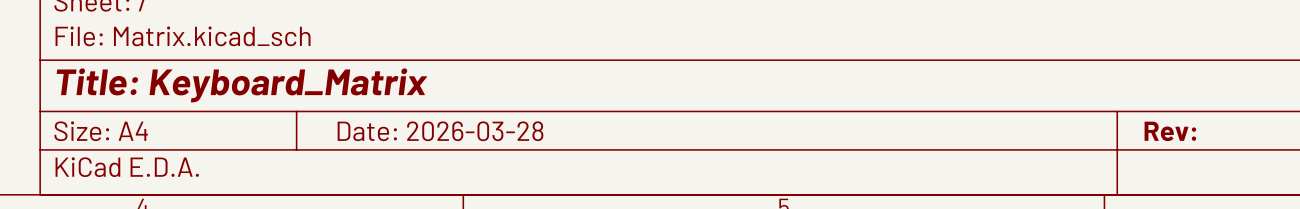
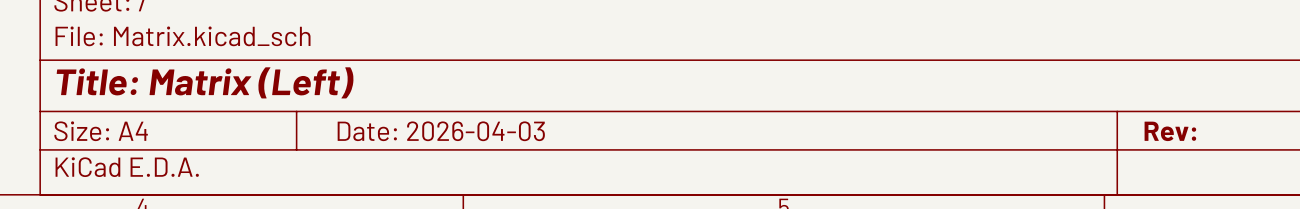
title block: Title: Keyboard_Matrix (241, 85) -> Title: Matrix (Left) (205, 82)
title block: Date: 2026-03-28 (440, 131) -> Date: 2026-04-03 (441, 131)

